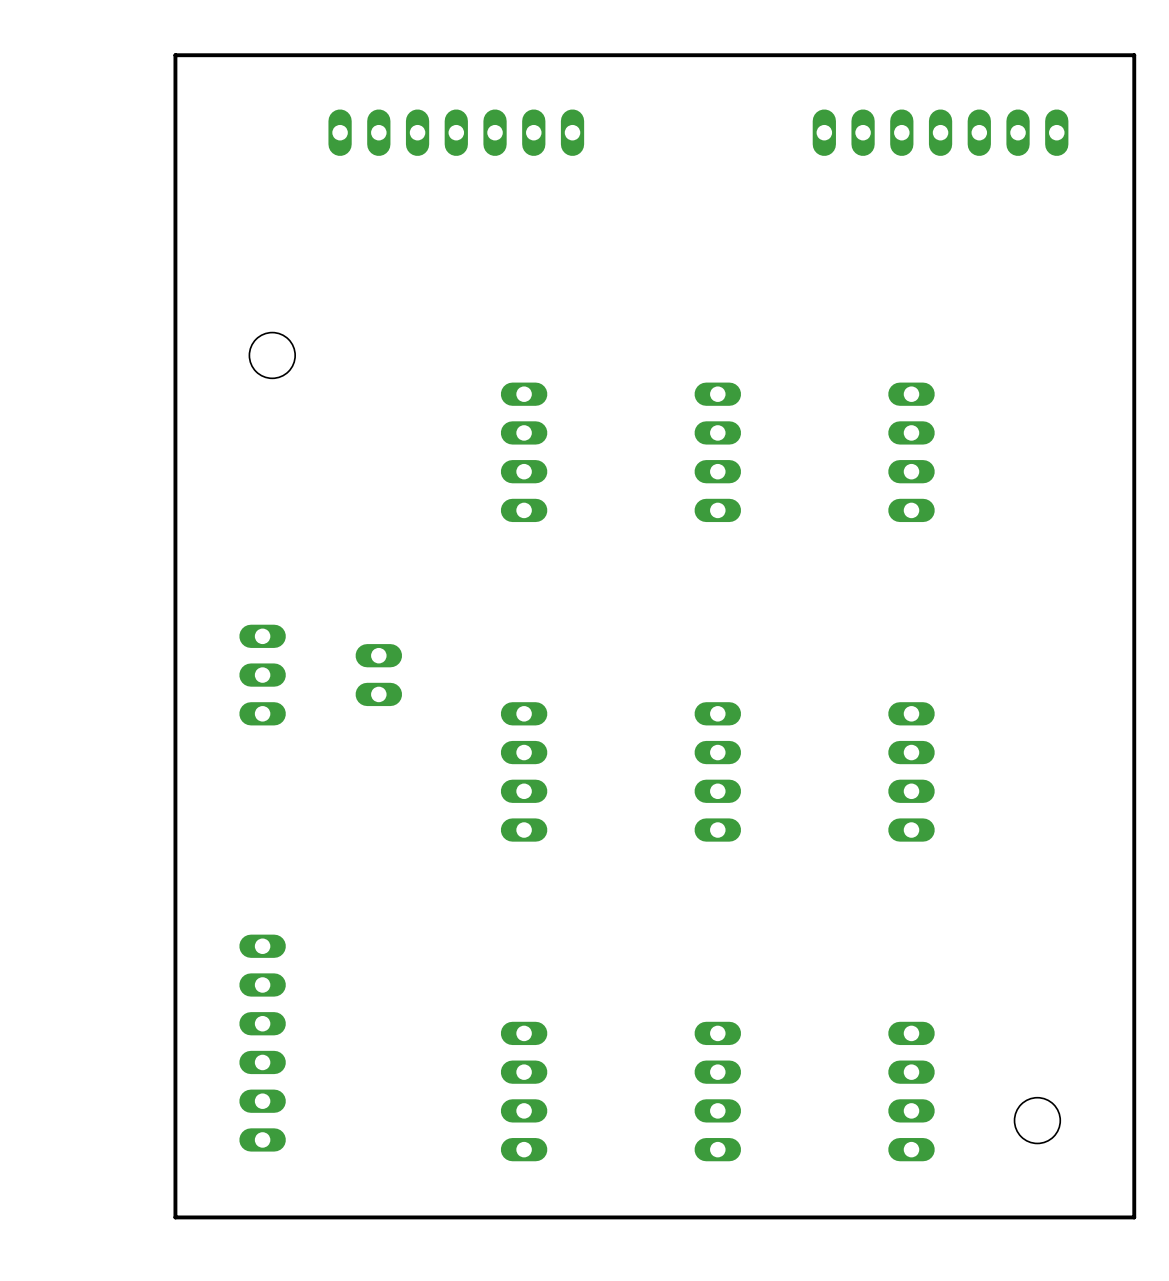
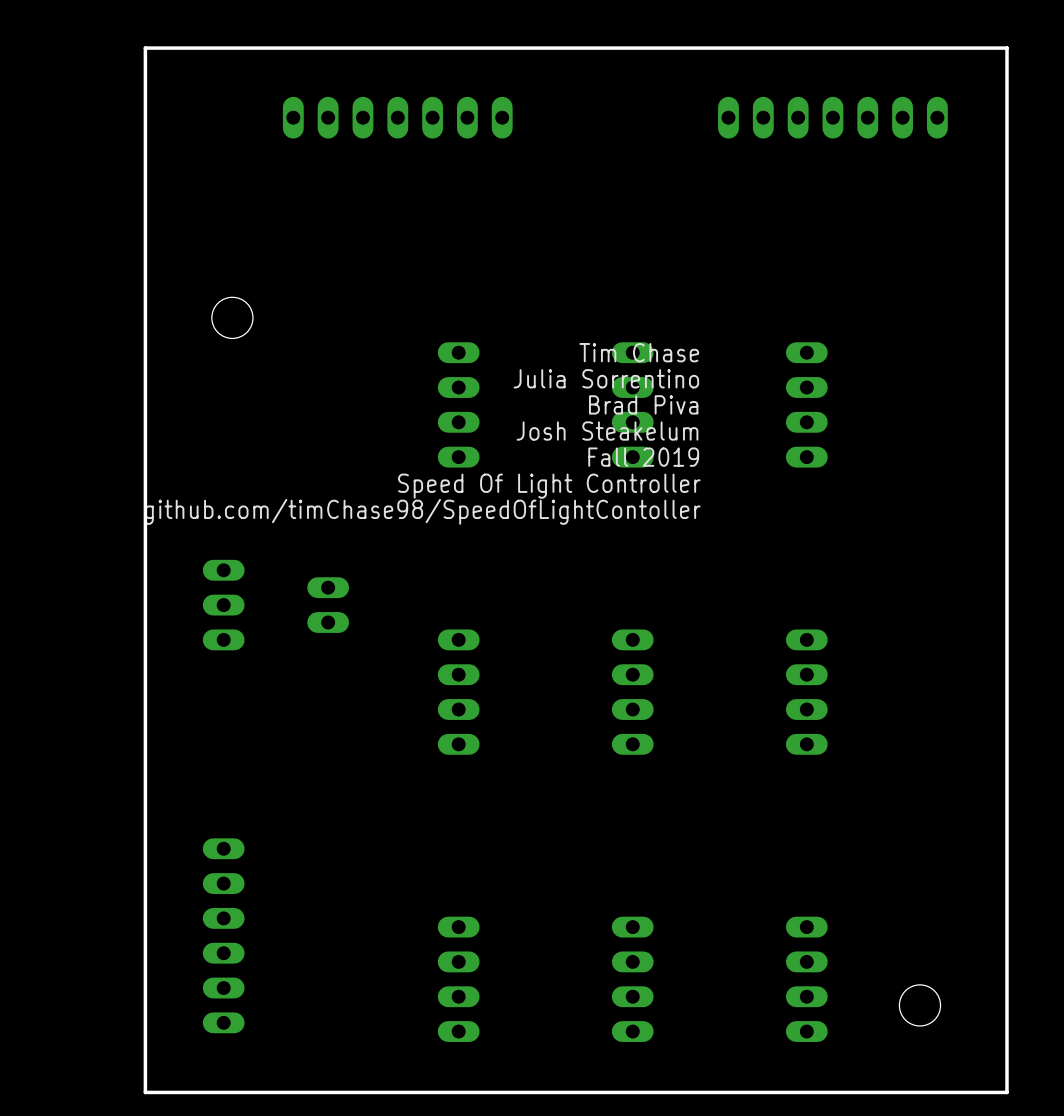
text: none -> Tim Chase (639, 352)
text: none -> Julia Sorrentino (606, 378)
text: none -> Brad Piva (643, 404)
text: none -> Josh Steakelum (607, 431)
text: none -> Fall 2019 (643, 457)
text: none -> Speed Of Light Controller (549, 486)
text: none -> github.com/timChase98/SpeedOfLightContoller (422, 511)

